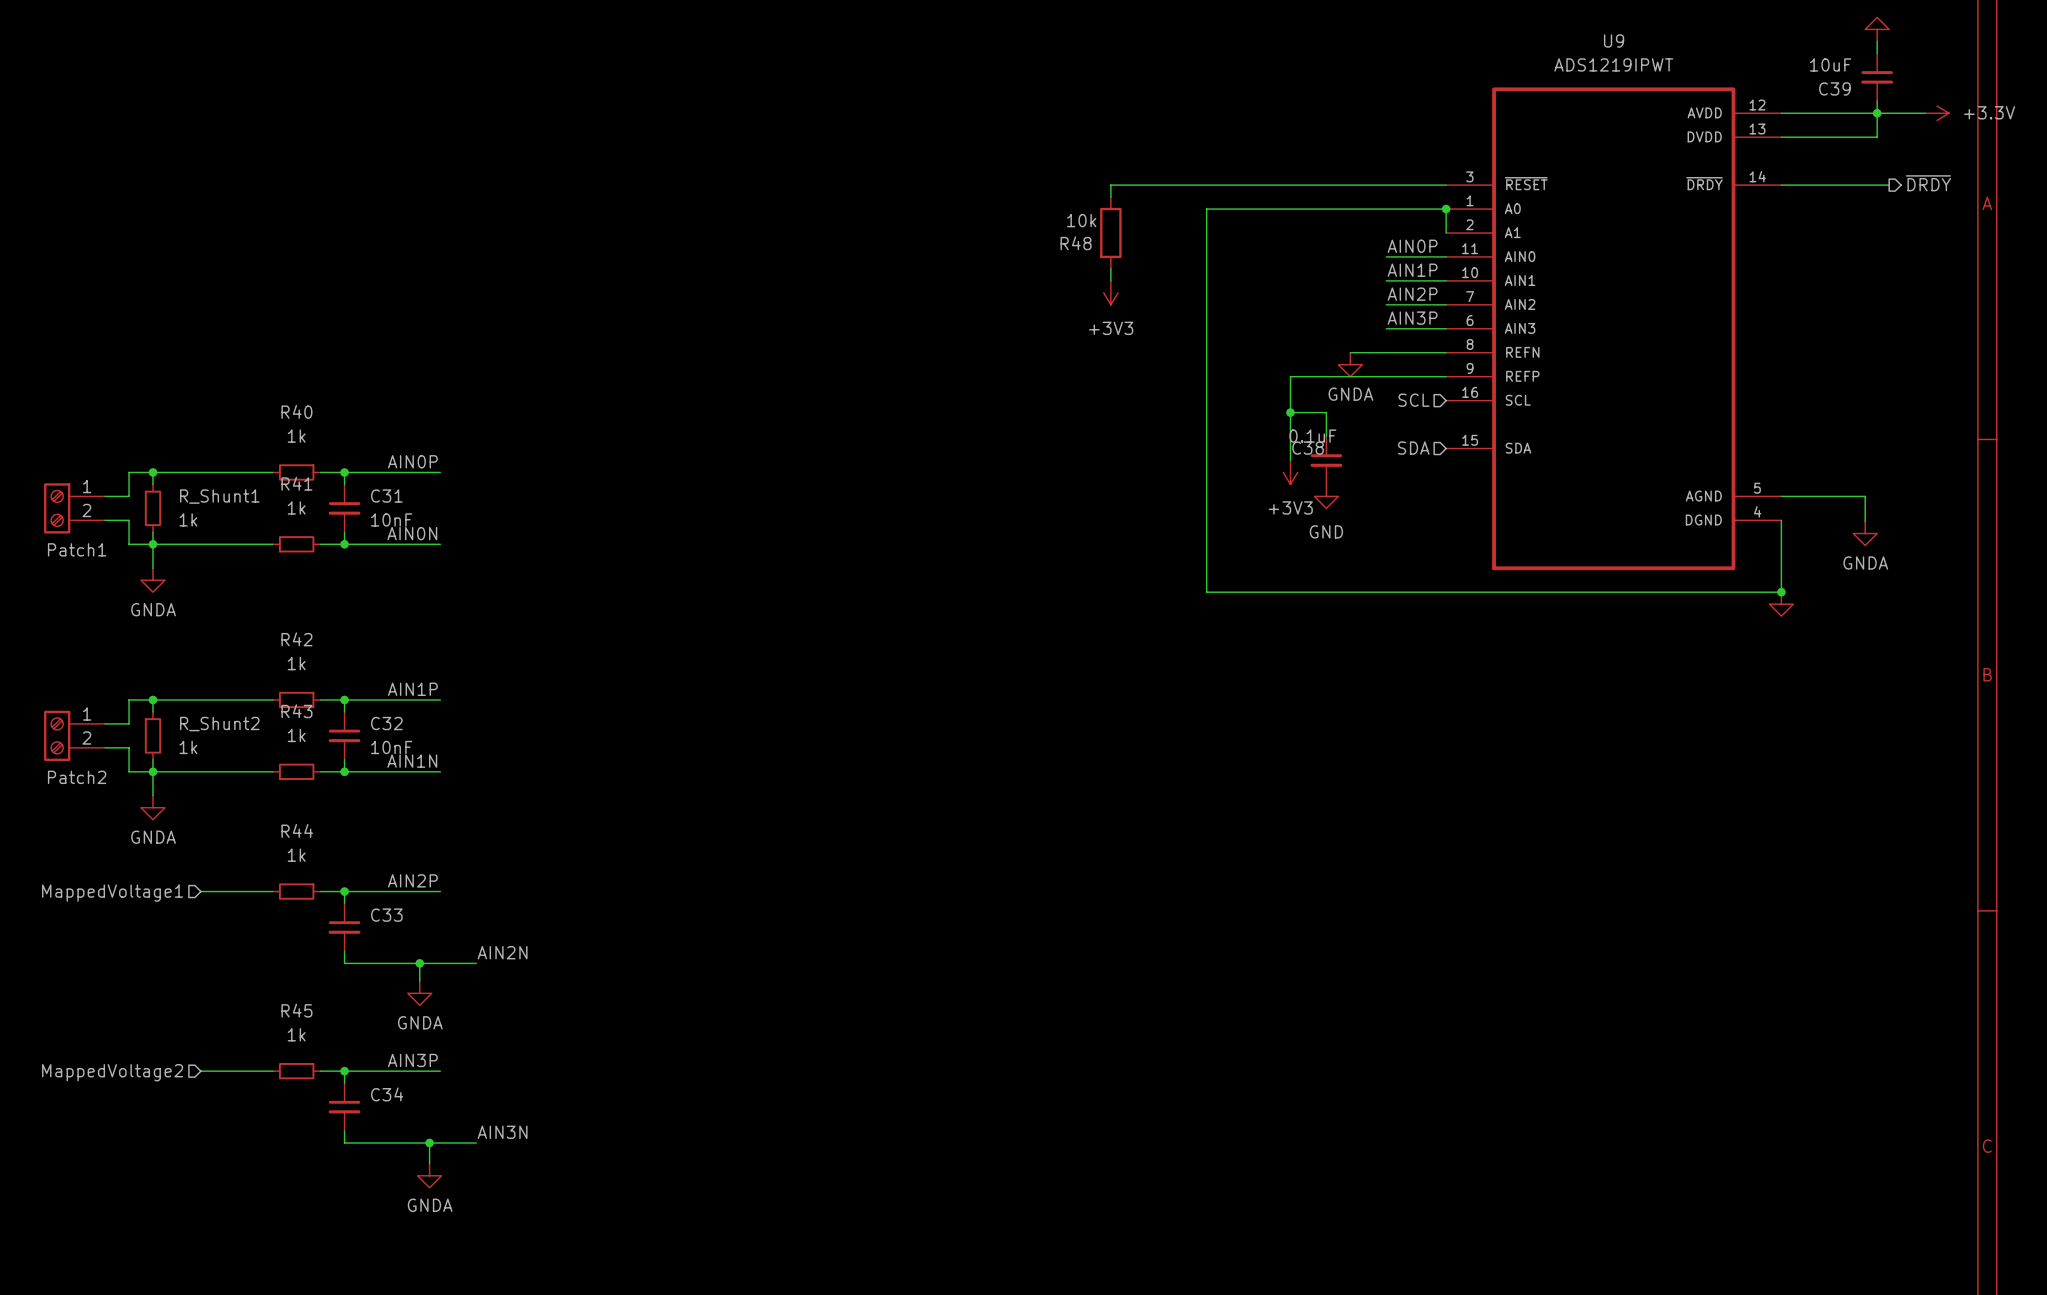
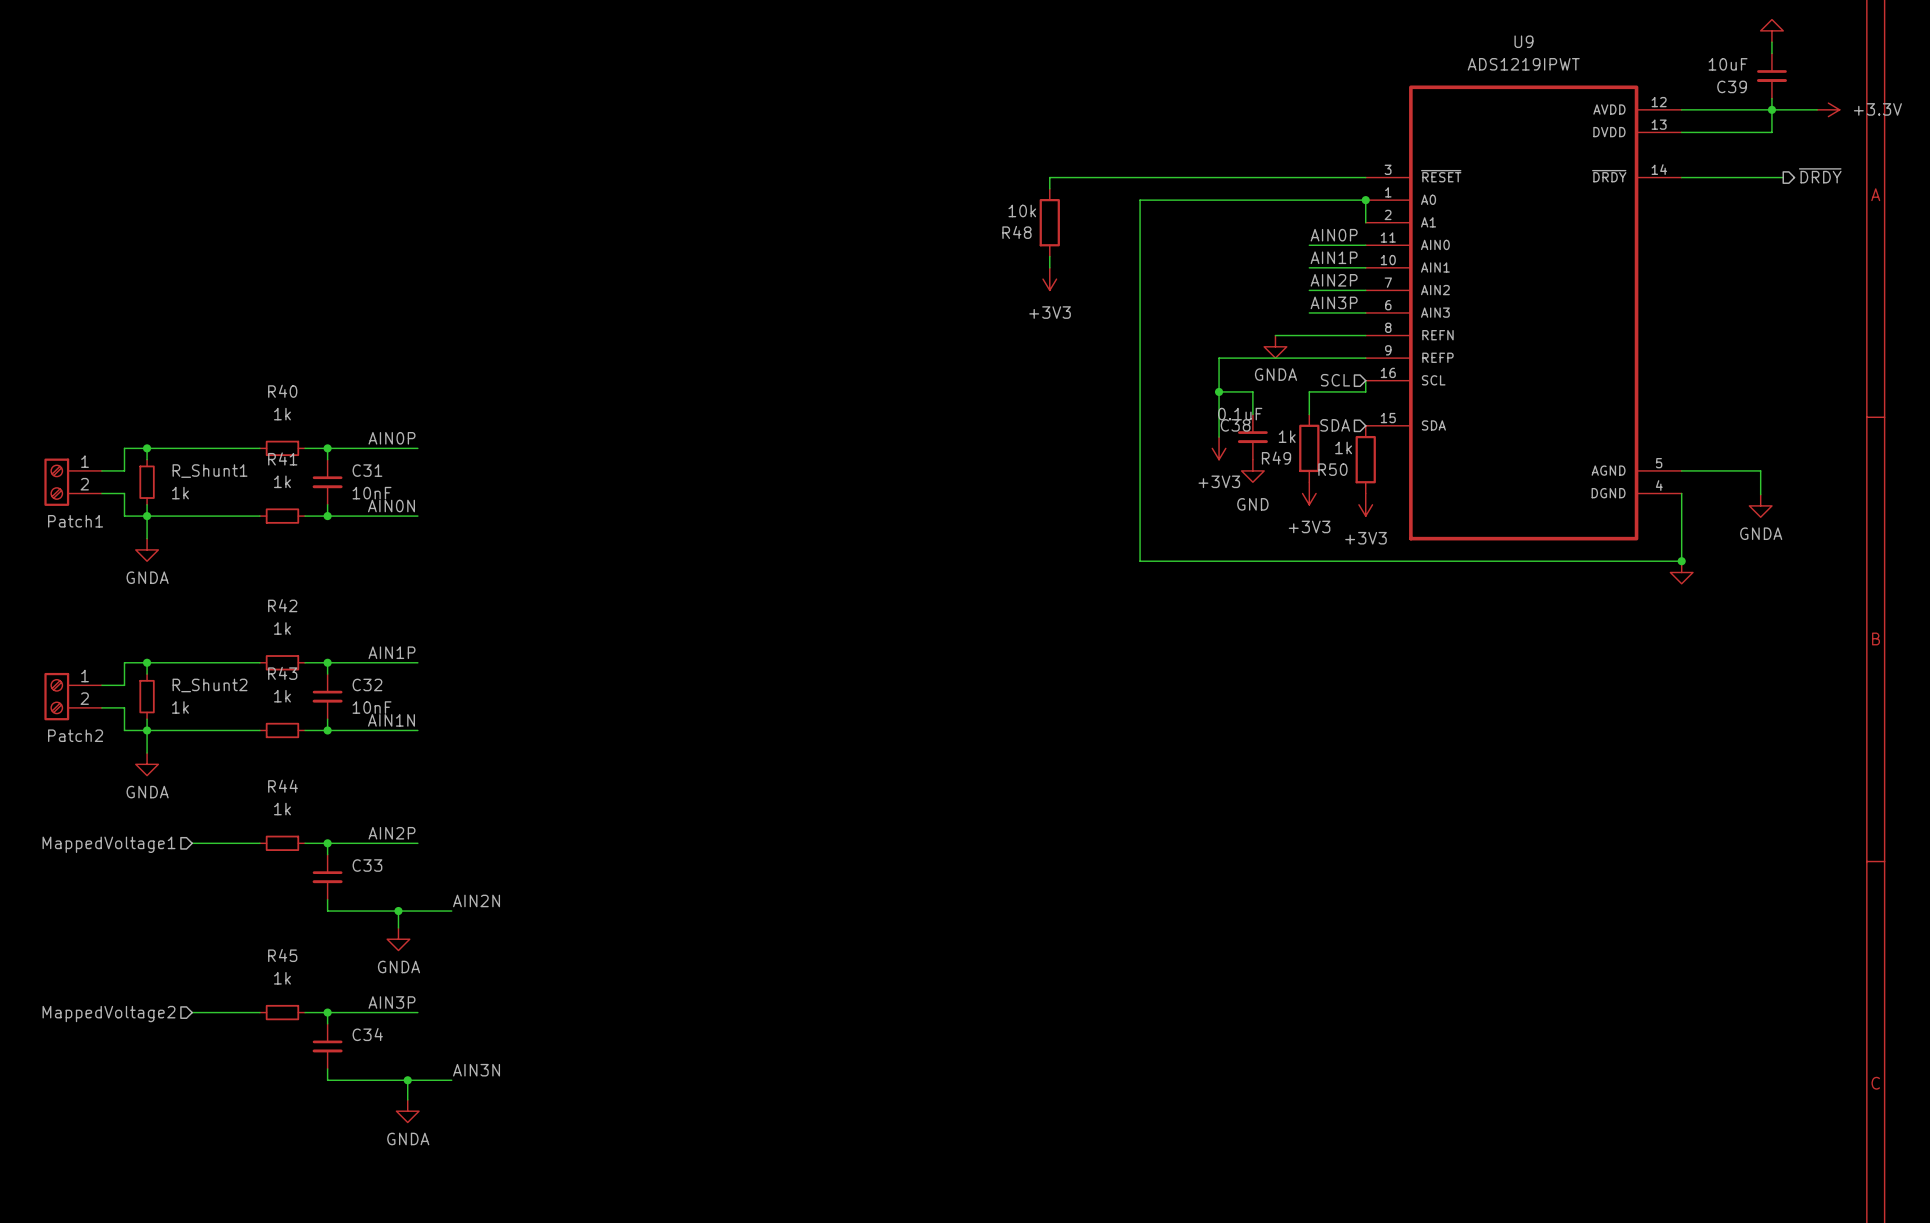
wire: none -> (1365, 380) (1365, 391) (1309, 391) (1309, 414)
R49: none -> 1k (1309, 448)
R50: none -> 1k (1365, 459)
power symbol: none -> +3V3 (1309, 493)
power symbol: none -> +3V3 (1365, 504)

